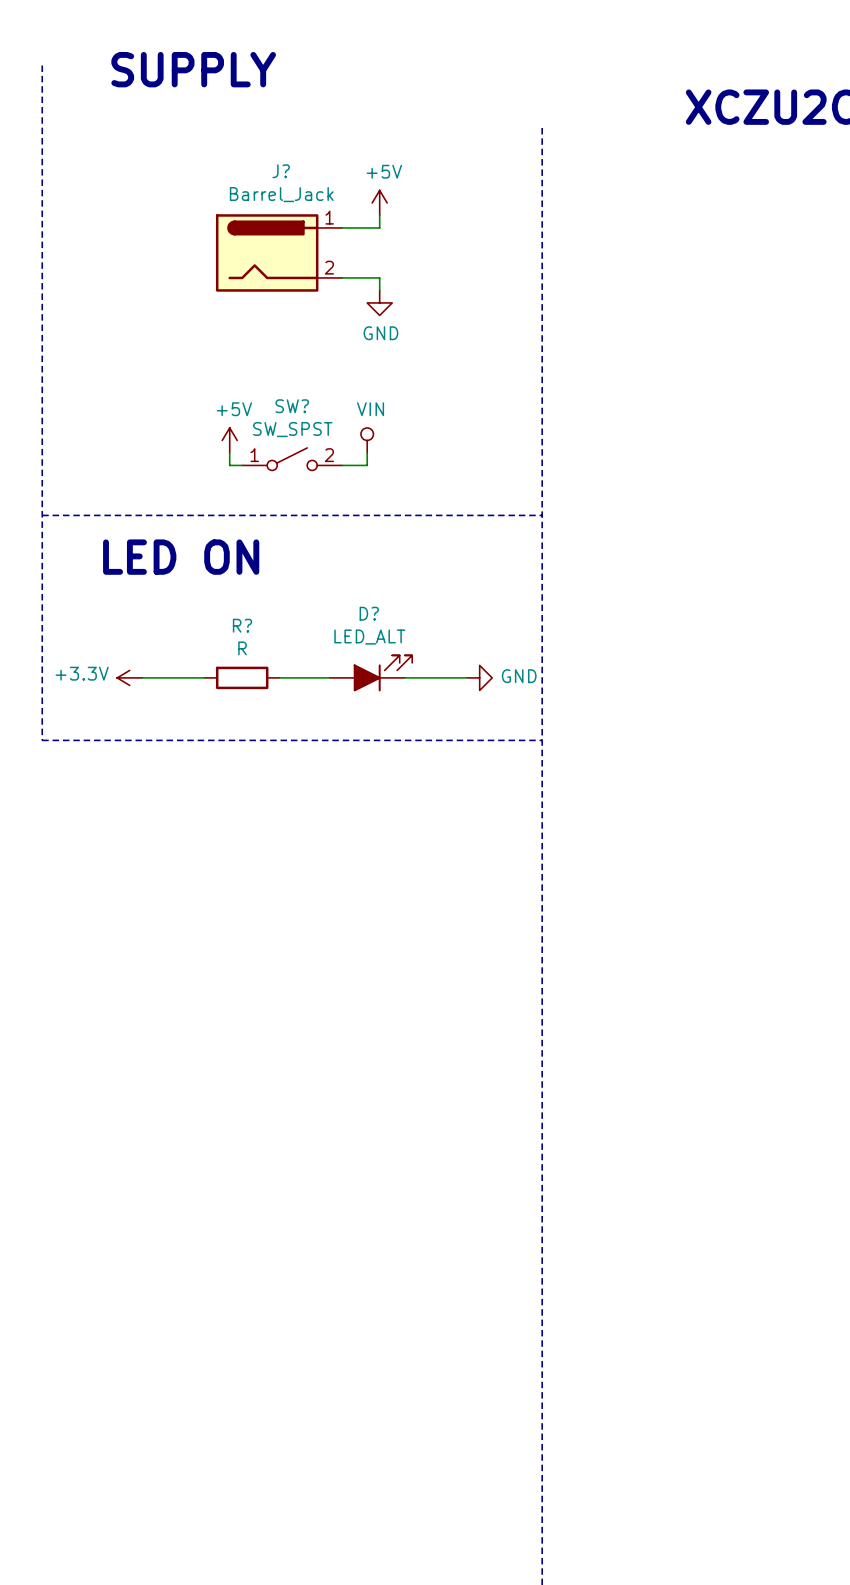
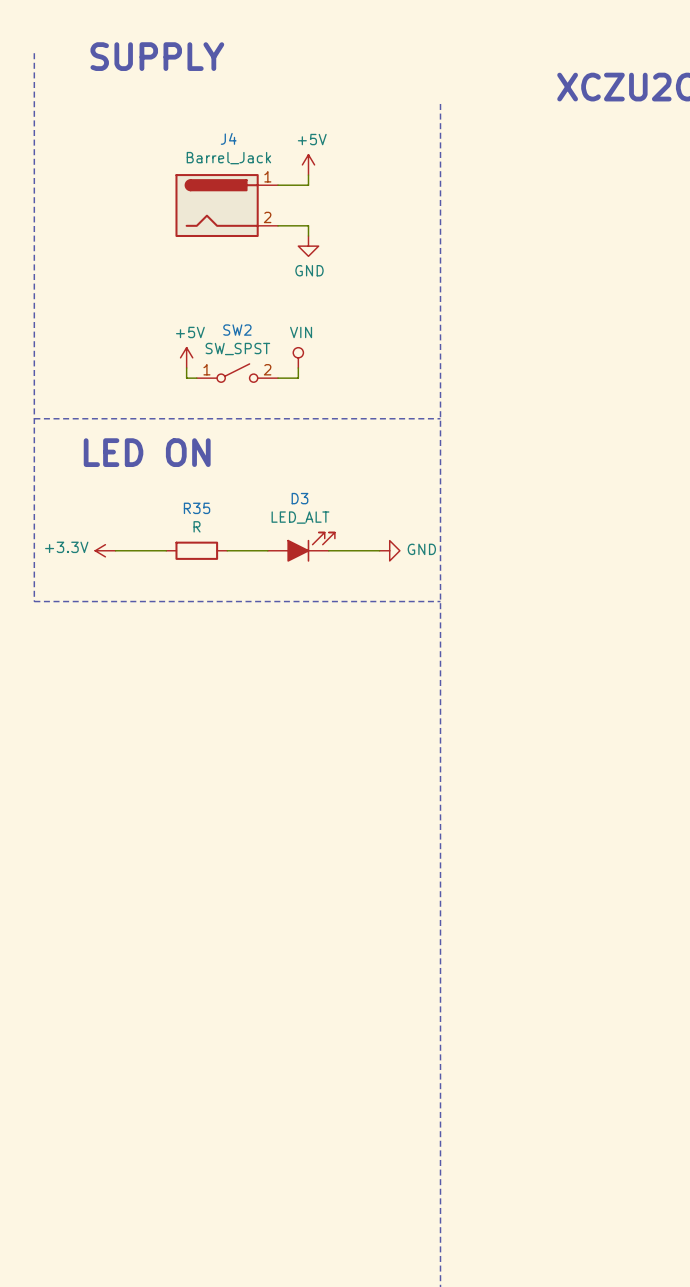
J? name: J? (281, 171) -> J4 (228, 138)
SW? name: SW? (292, 406) -> SW2 (237, 330)
D? name: D? (369, 613) -> D3 (299, 498)
R? name: R? (242, 625) -> R35 (197, 508)

